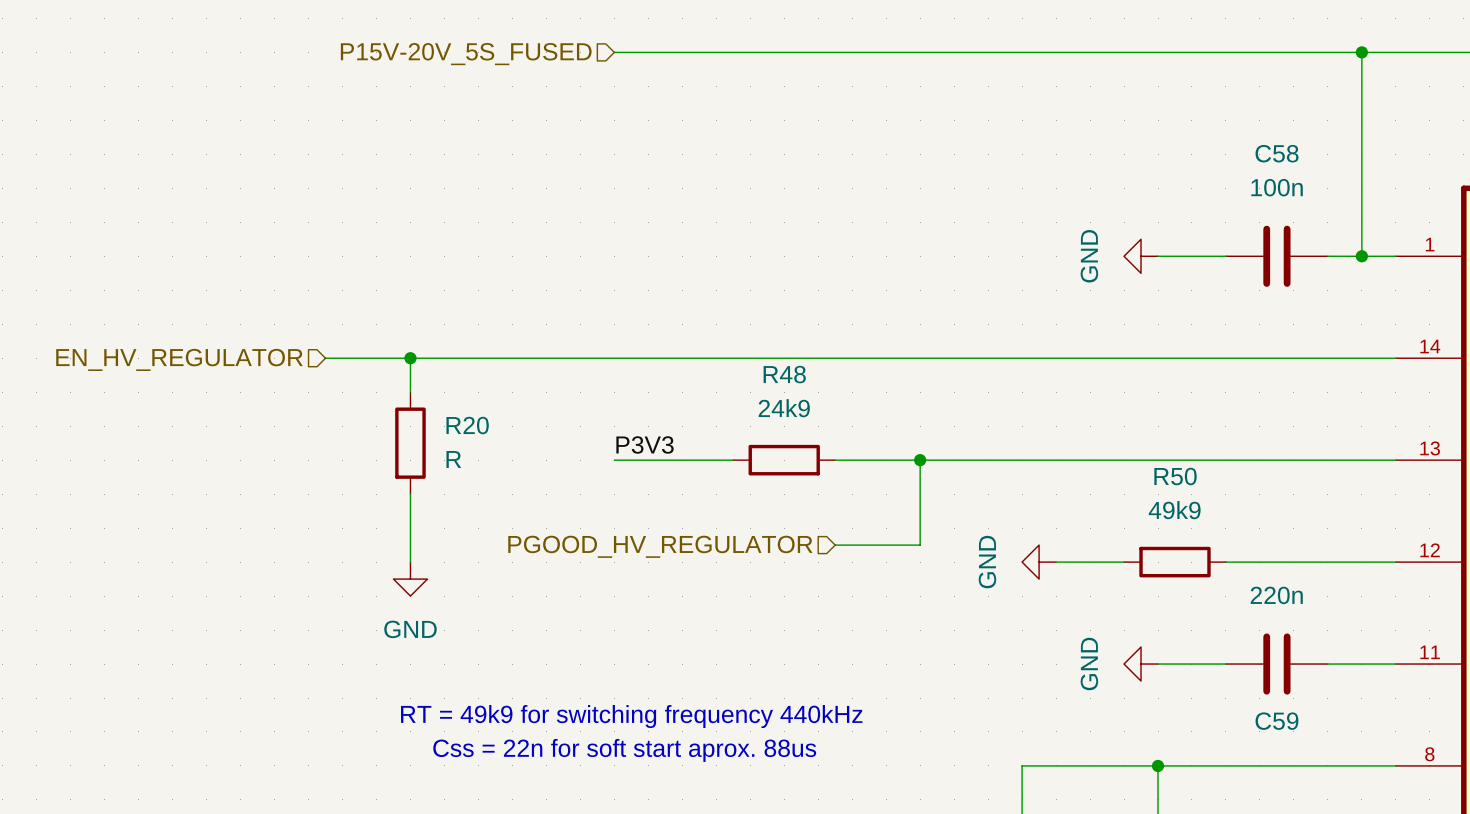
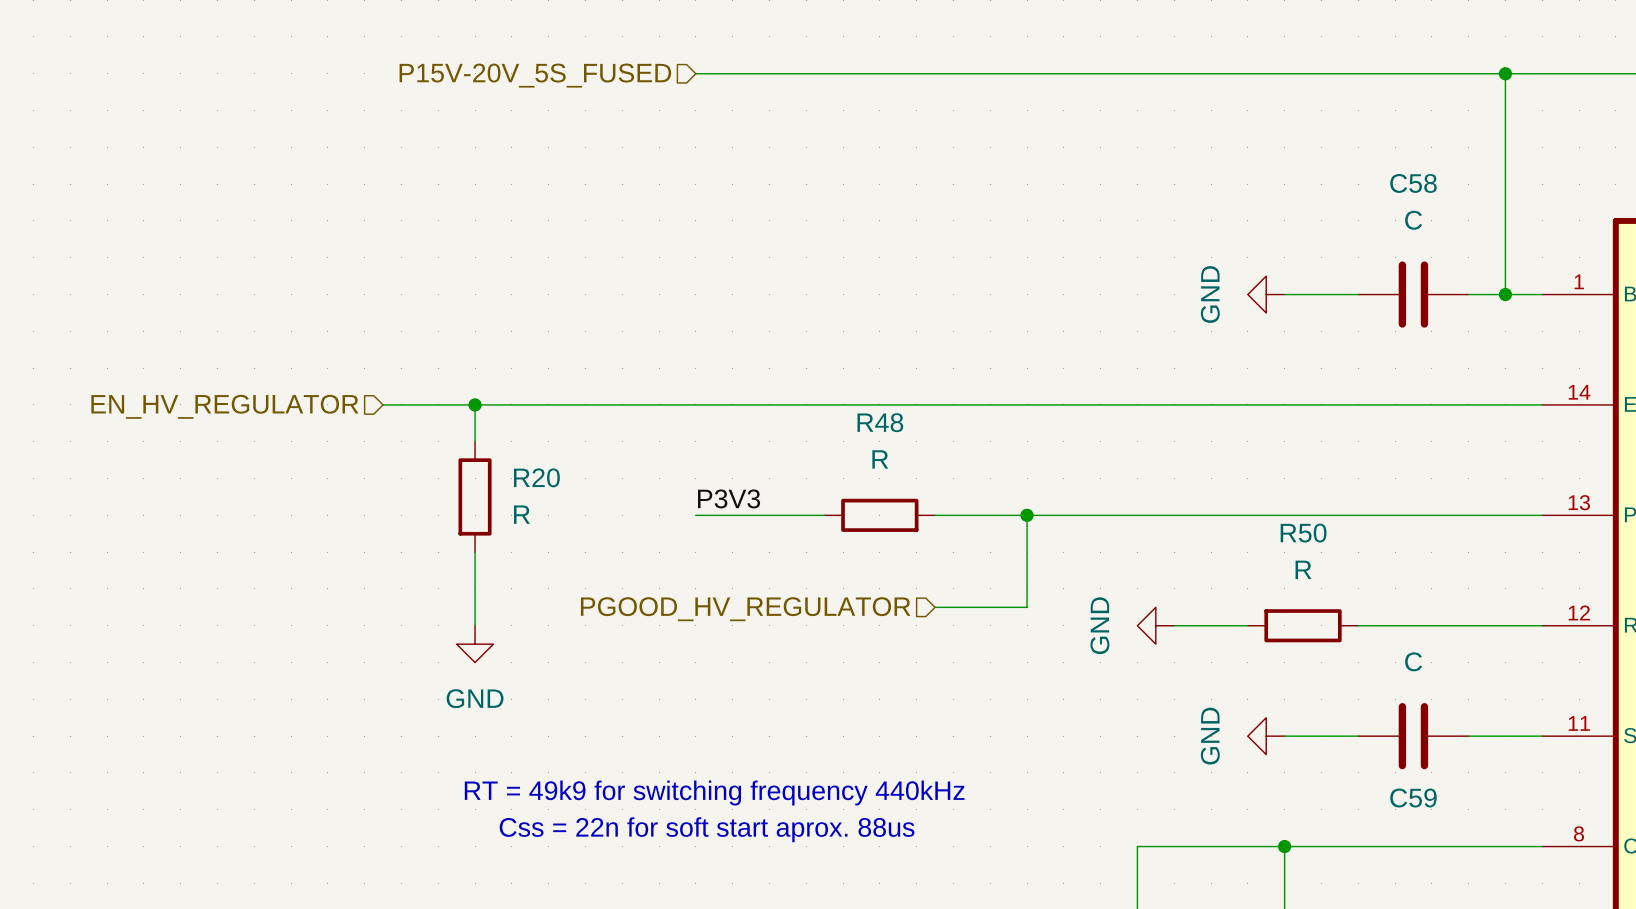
C58 value: 100n (1277, 187) -> C (1413, 220)
R48 value: 24k9 (784, 408) -> R (880, 459)
R50 value: 49k9 (1174, 510) -> R (1303, 569)
C59 value: 220n (1276, 595) -> C (1413, 661)

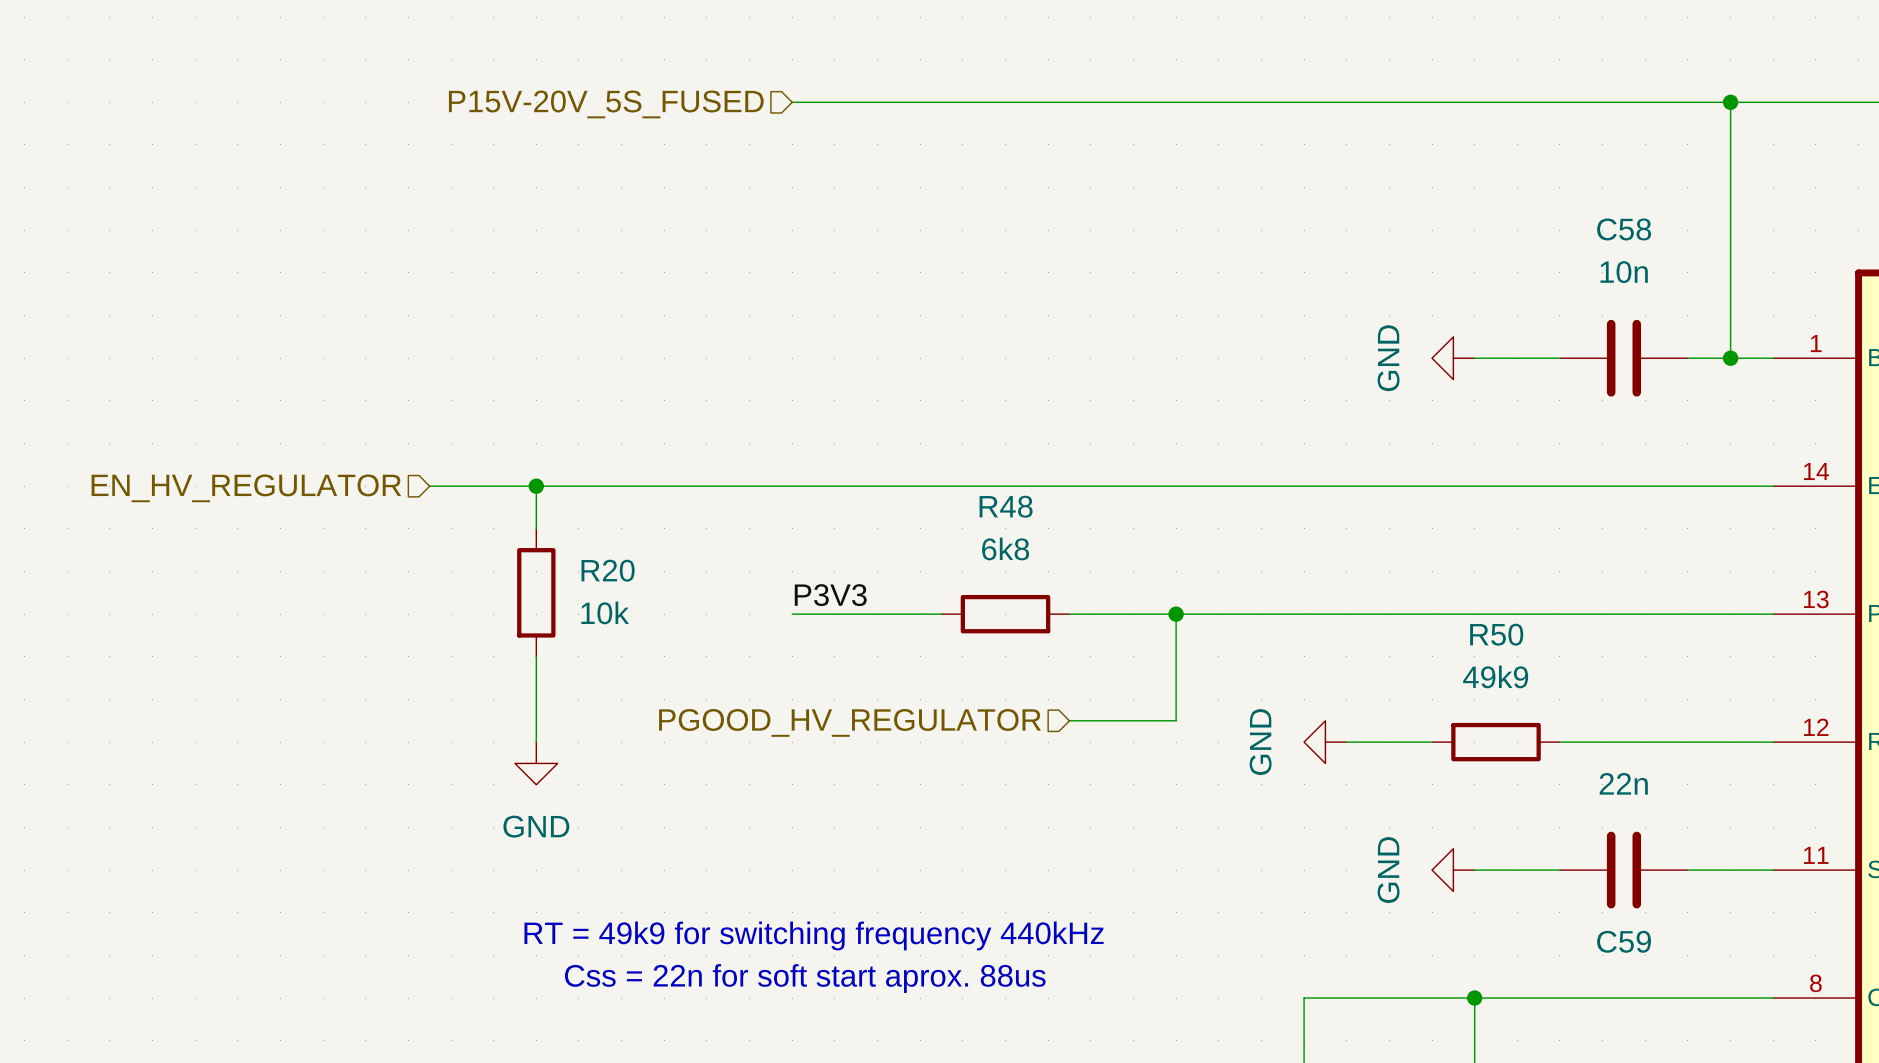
C58 value: C (1413, 220) -> 10n (1624, 272)
R48 value: R (880, 459) -> 6k8 (1005, 548)
R20 value: R (521, 514) -> 10k (605, 612)
R50 value: R (1303, 569) -> 49k9 (1495, 676)
C59 value: C (1413, 661) -> 22n (1623, 783)

